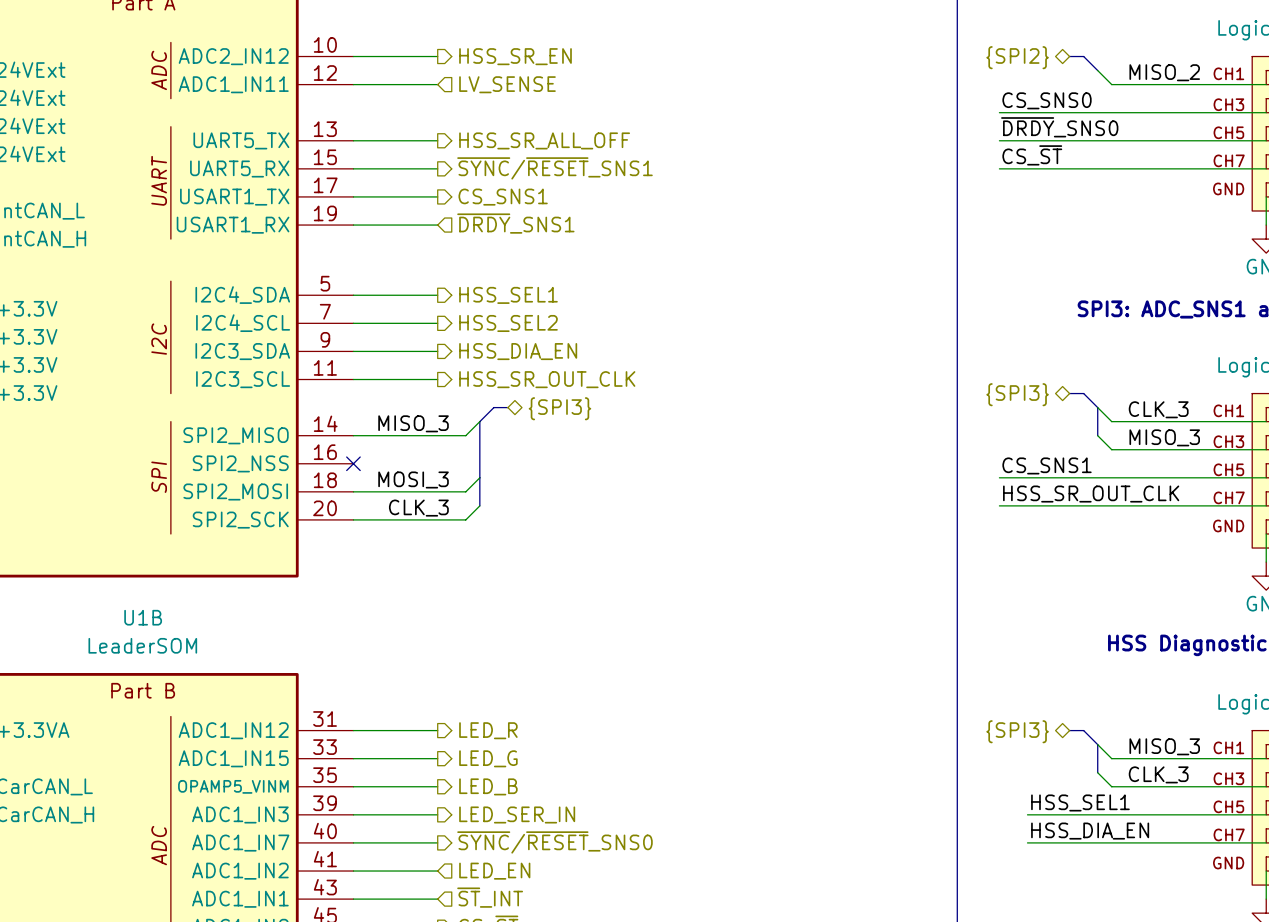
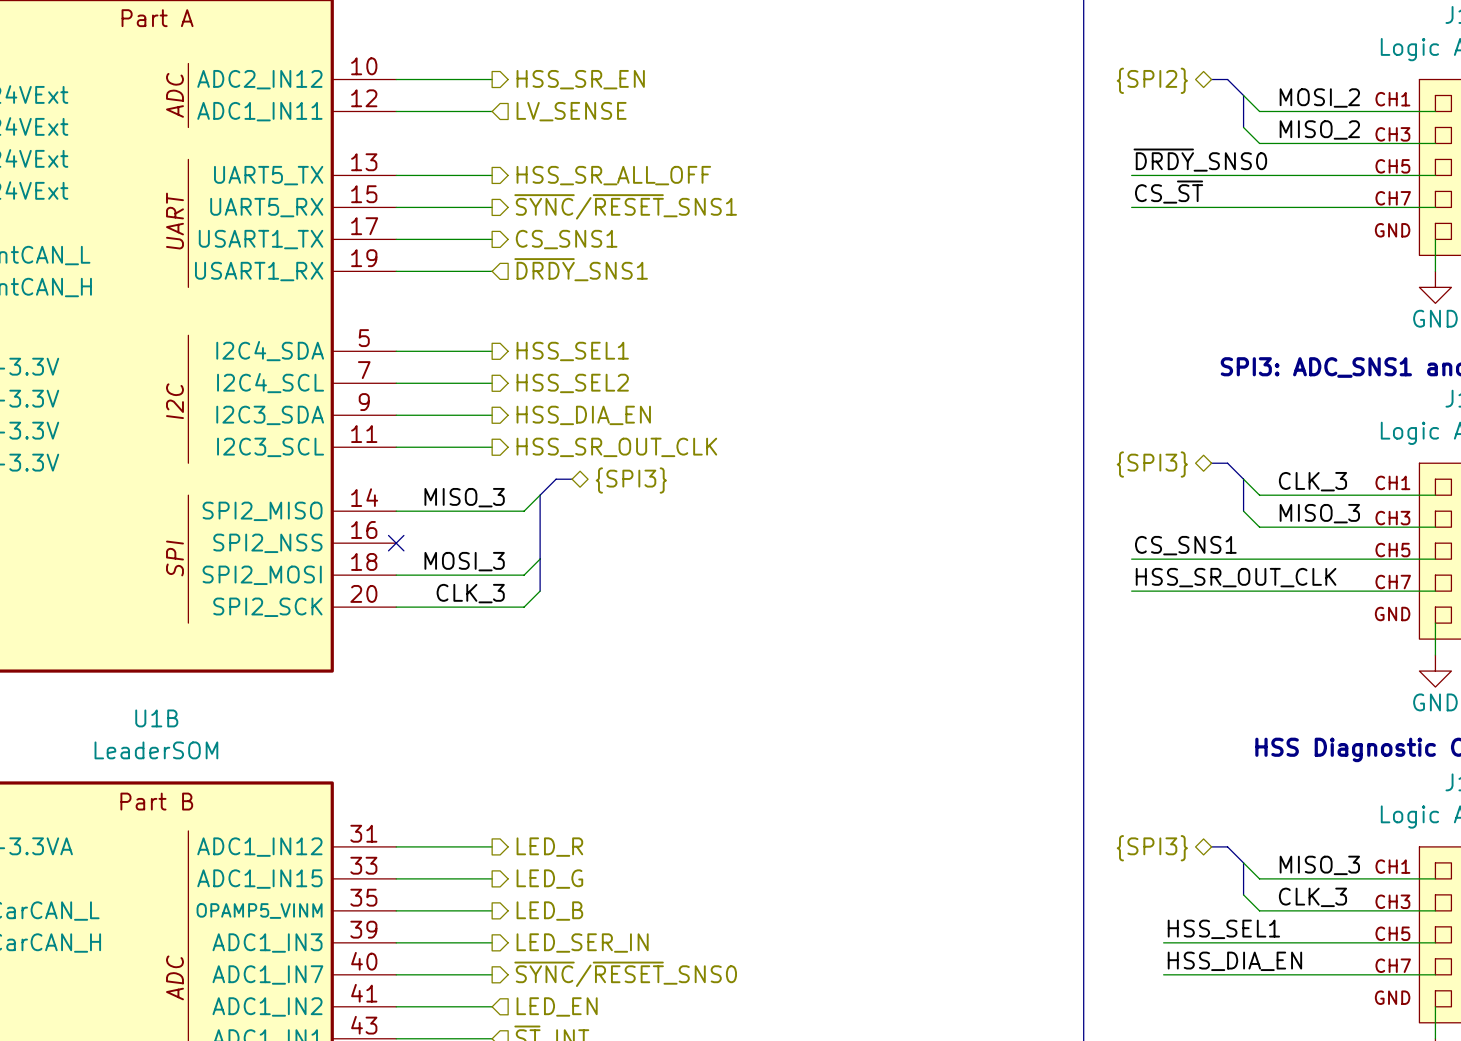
bus: none -> (1243, 95) (1243, 127)
label: MISO_2 (1164, 72) -> MOSI_2 (1319, 97)
label: CS_SNS0 (1047, 100) -> none
label: none -> MISO_2 (1319, 129)
wire: (999, 112) (1111, 112) -> (1243, 127) (1259, 143)

